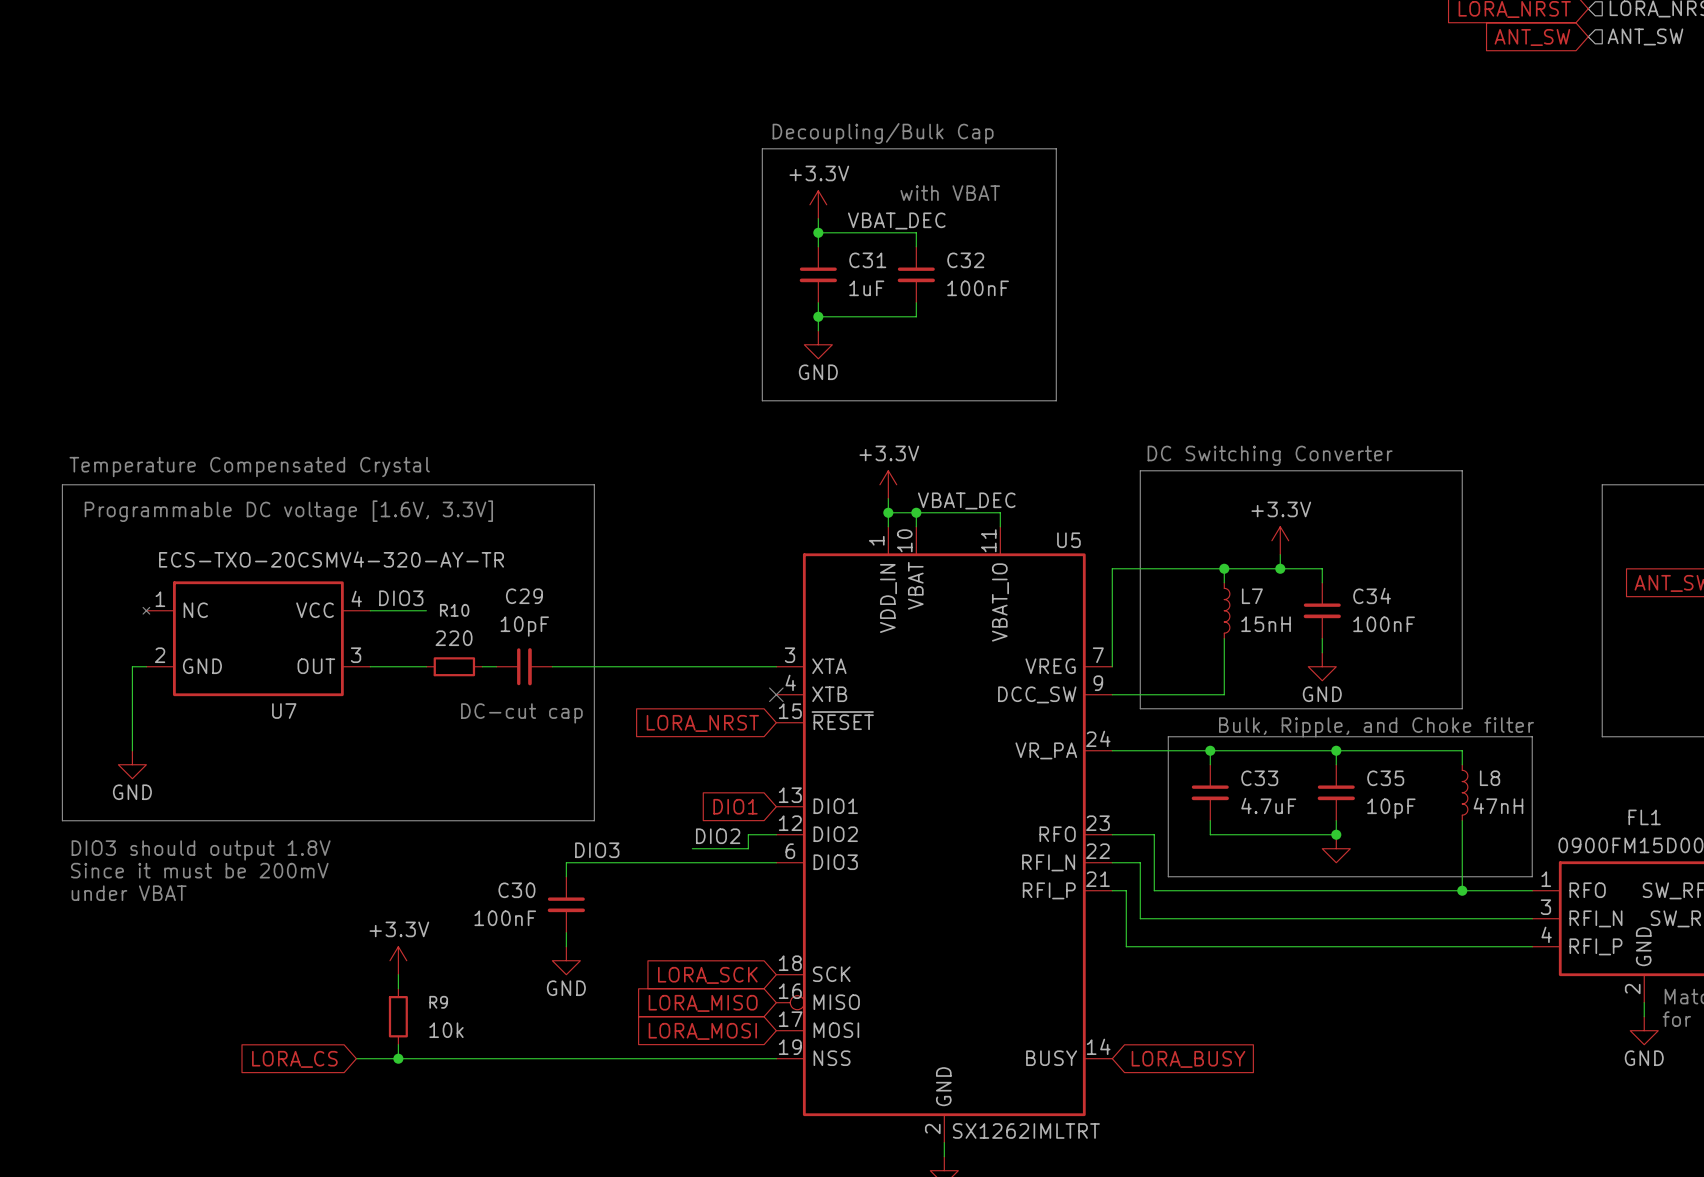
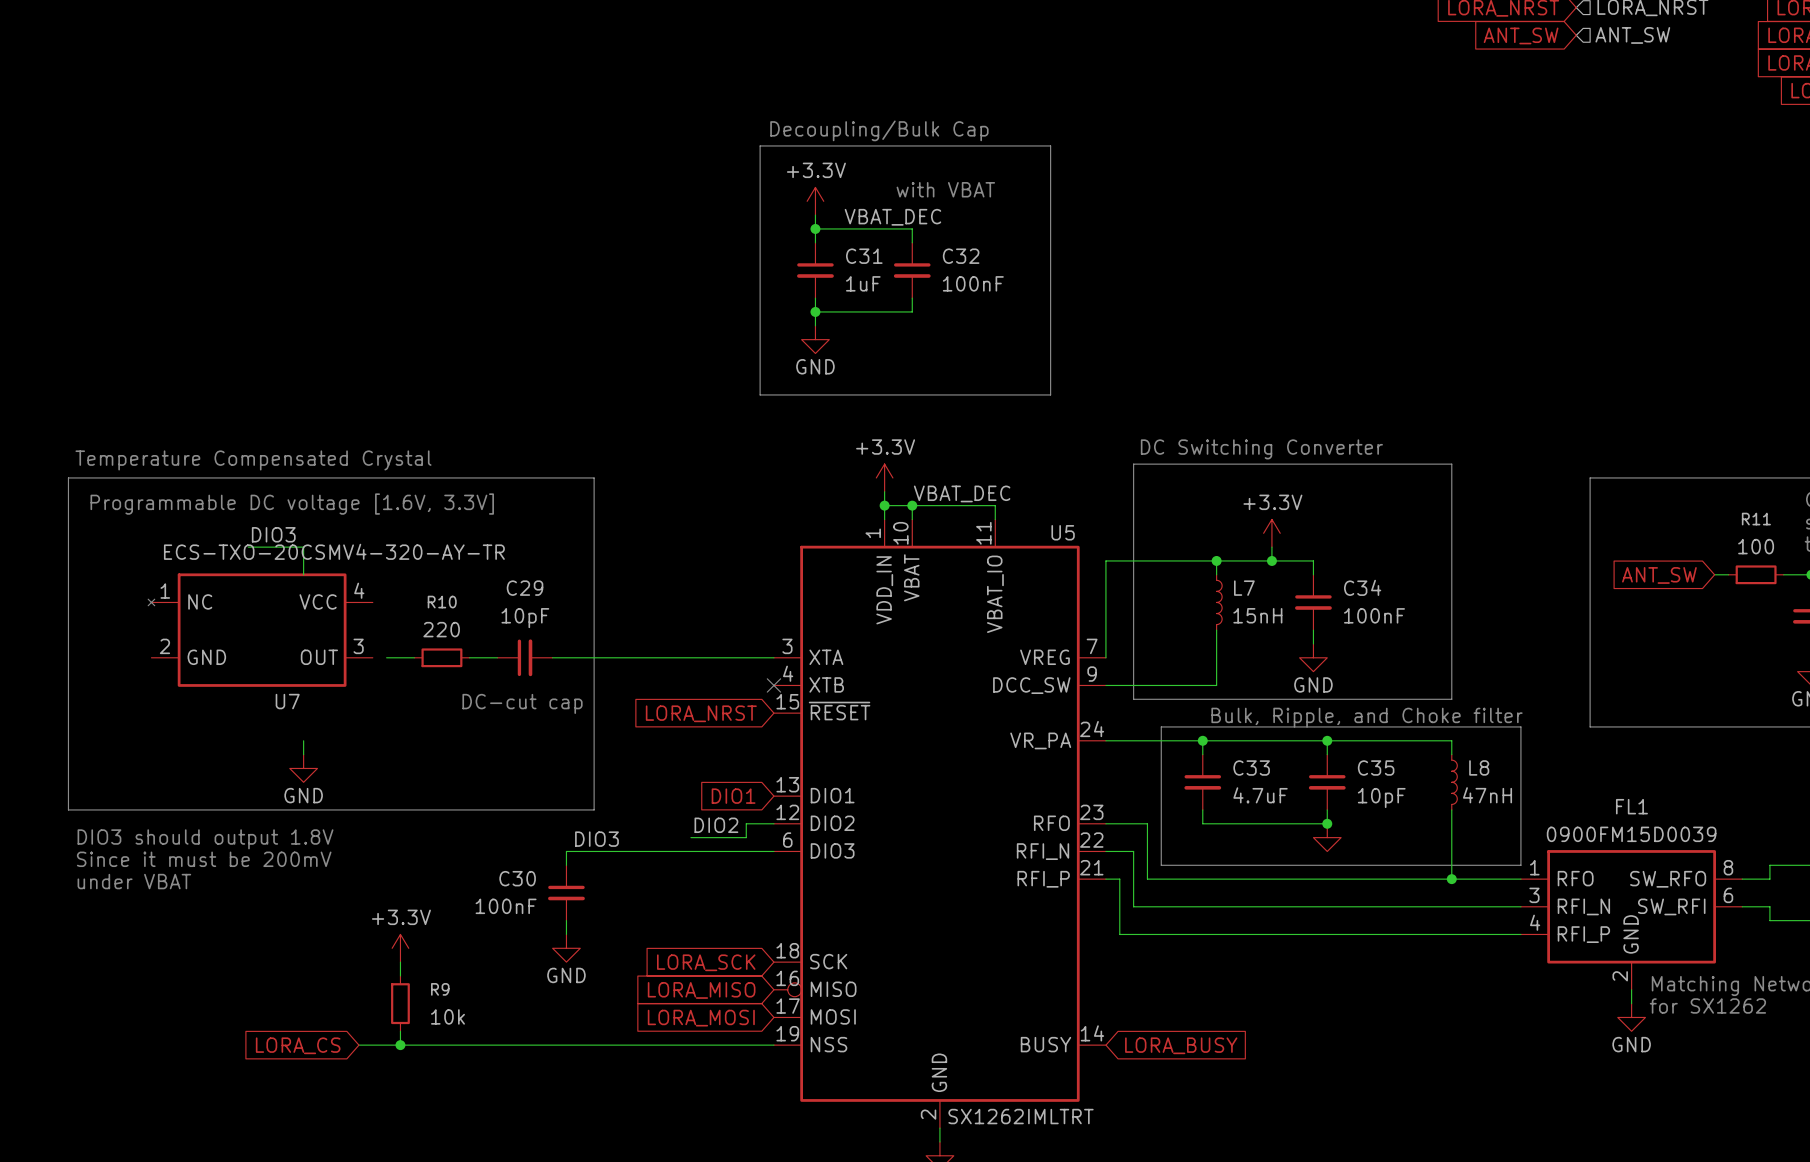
wire: none -> (248, 547) (303, 547) (303, 574)
label position: DIO3 (401, 598) -> DIO3 (273, 534)
wire: (370, 610) (426, 610) -> none
wire: (146, 666) (132, 666) (132, 750) -> none
wire: (370, 666) (384, 666) -> none
R10 position: (454, 666) -> (441, 657)
wire: none -> (303, 740) (303, 754)
power symbol position: GND (132, 764) -> GND (303, 768)

